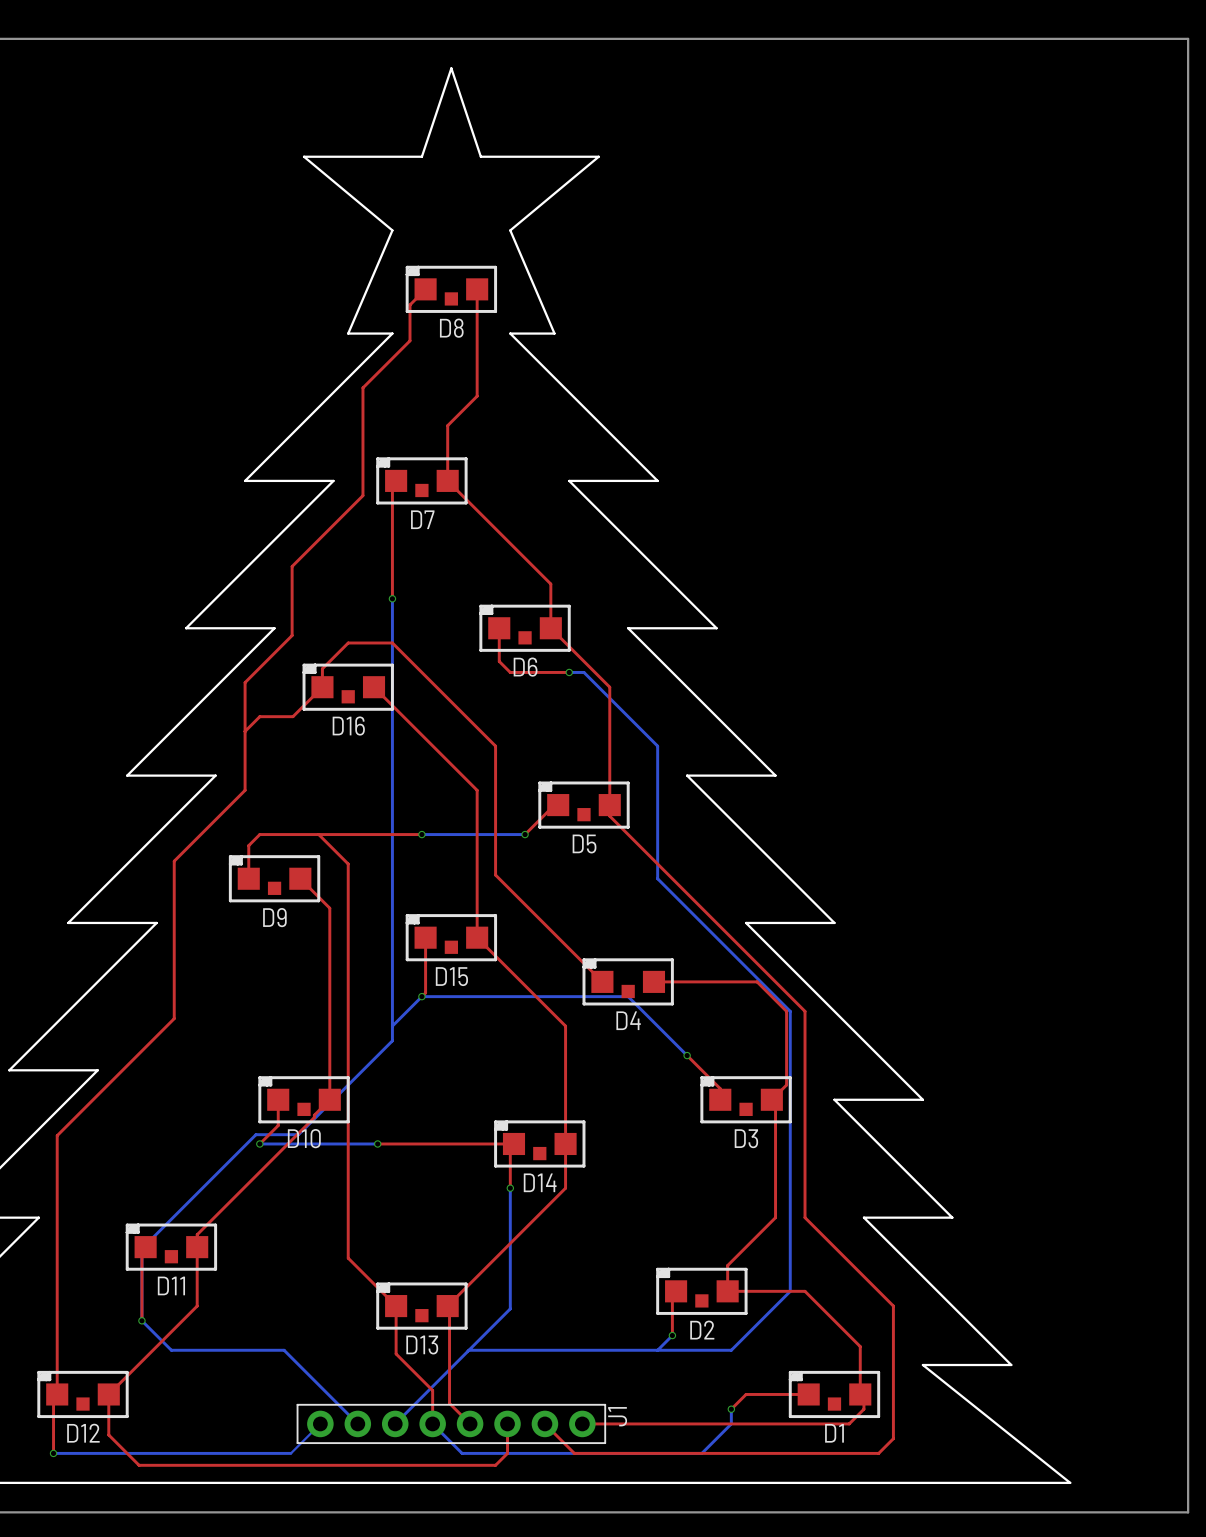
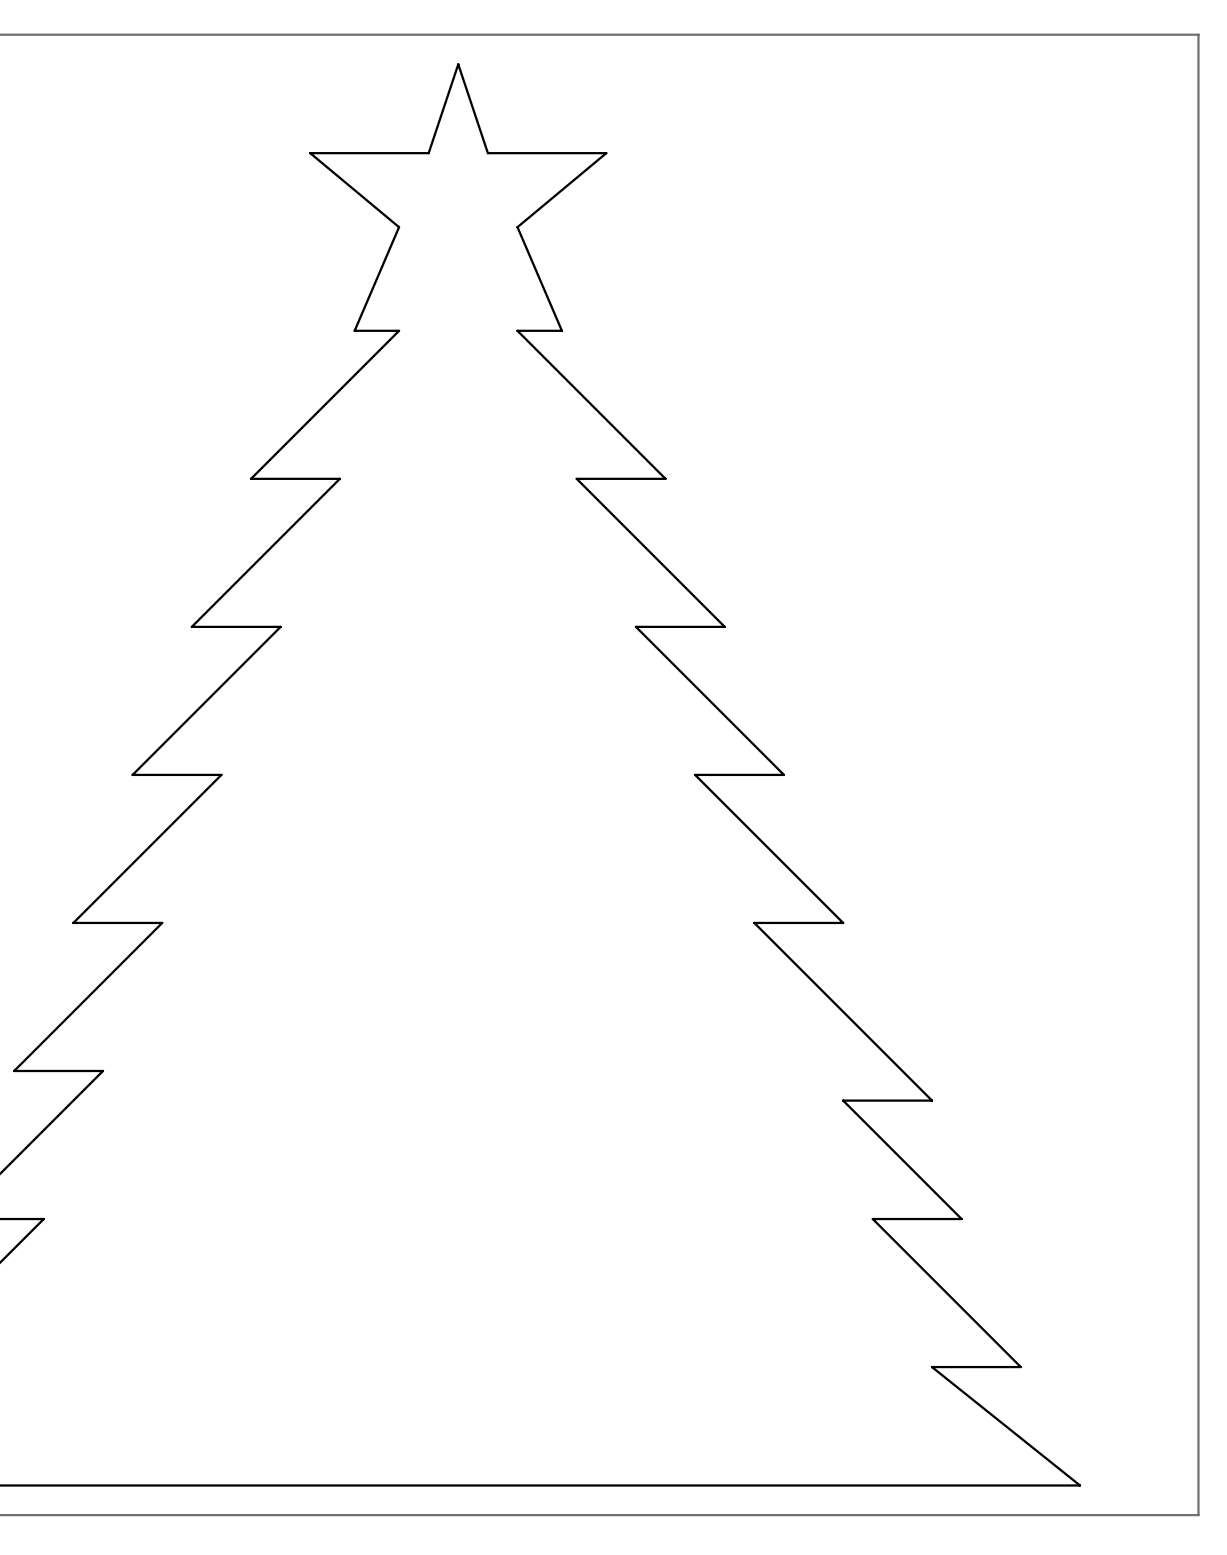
top track: (425, 289) (410, 304) (410, 340) (362, 387) (362, 495) (292, 566) (292, 635) (245, 682) (245, 790) (174, 861) (174, 1018) (57, 1135) (57, 1394) (53, 1398) (53, 1453) -> none
D8: (451, 289) -> none
top track: (477, 289) (477, 396) (447, 425) (447, 480) (550, 584) (550, 628) (609, 687) (609, 816) (805, 1011) (805, 1217) (893, 1306) (893, 1438) (878, 1453) (574, 1453) (544, 1423) -> none
top track: (396, 480) (392, 484) (392, 598) -> none
D7: (421, 480) -> none
bottom track: (392, 598) (392, 1040) (298, 1134) (255, 1134) (141, 1248) (141, 1320) (171, 1350) (284, 1350) (357, 1423) -> none
via: (392, 598) -> none
top track: (499, 628) (499, 661) (510, 672) (569, 672) -> none
D6: (525, 628) -> none
bottom track: (569, 672) (583, 672) (657, 746) (657, 878) (790, 1011) (790, 1291) (731, 1350) (468, 1350) -> none
via: (569, 672) -> none
D16: (348, 687) -> none
top track: (374, 687) (477, 790) (477, 937) (565, 1026) (565, 1188) (447, 1306) -> none
top track: (245, 731) (259, 716) (292, 716) (322, 687) (322, 668) (348, 642) (392, 642) (495, 746) (495, 875) (602, 981) -> none
top track: (558, 805) (554, 805) (525, 834) -> none
D5: (583, 805) -> none
top track: (318, 834) (348, 864) (348, 1258) (396, 1306) (396, 1353) (432, 1390) (432, 1423) -> none
top track: (421, 834) (259, 834) (248, 845) (248, 878) -> none
bottom track: (421, 834) (525, 834) -> none
via: (421, 834) -> none
via: (525, 834) -> none
D9: (274, 878) -> none
top track: (300, 878) (329, 908) (329, 1099) (197, 1234) (197, 1306) (108, 1394) (108, 1435) (139, 1465) (495, 1465) (507, 1453) (507, 1423) -> none
top track: (425, 937) (425, 992) (421, 996) -> none
D15: (451, 937) -> none
D4: (628, 981) -> none
top track: (653, 981) (757, 981) (786, 1011) (786, 1085) (771, 1099) (775, 1103) (775, 1217) (727, 1265) (727, 1291) (805, 1291) (860, 1346) (860, 1394) (863, 1398) (863, 1409) (849, 1423) (582, 1423) -> none
via: (421, 996) -> none
bottom track: (392, 1026) (421, 996) (628, 996) (687, 1055) -> none
top track: (687, 1055) (720, 1088) (720, 1099) -> none
via: (687, 1055) -> none
top track: (278, 1099) (278, 1125) (259, 1143) -> none
D10: (304, 1099) -> none
D3: (746, 1099) -> none
bottom track: (259, 1143) (377, 1143) -> none
via: (259, 1143) -> none
top track: (377, 1143) (514, 1143) (510, 1147) (510, 1188) -> none
via: (377, 1143) -> none
D14: (539, 1143) -> none
bottom track: (510, 1188) (510, 1308) (395, 1423) -> none
via: (510, 1188) -> none
top track: (145, 1247) (141, 1250) (141, 1320) -> none
D11: (171, 1247) -> none
top track: (676, 1291) (672, 1295) (672, 1335) -> none
D2: (701, 1291) -> none
top track: (449, 1304) (449, 1403) (470, 1423) -> none
D13: (421, 1306) -> none
via: (141, 1320) -> none
bottom track: (672, 1335) (657, 1350) -> none
via: (672, 1335) -> none
D12: (83, 1394) -> none
top track: (808, 1394) (746, 1394) (731, 1409) -> none
D1: (834, 1394) -> none
bottom track: (731, 1409) (731, 1423) (701, 1453) (462, 1453) (432, 1423) -> none
via: (731, 1409) -> none
bottom track: (320, 1423) (290, 1453) (53, 1453) -> none
J1: (451, 1423) -> none
via: (53, 1453) -> none

